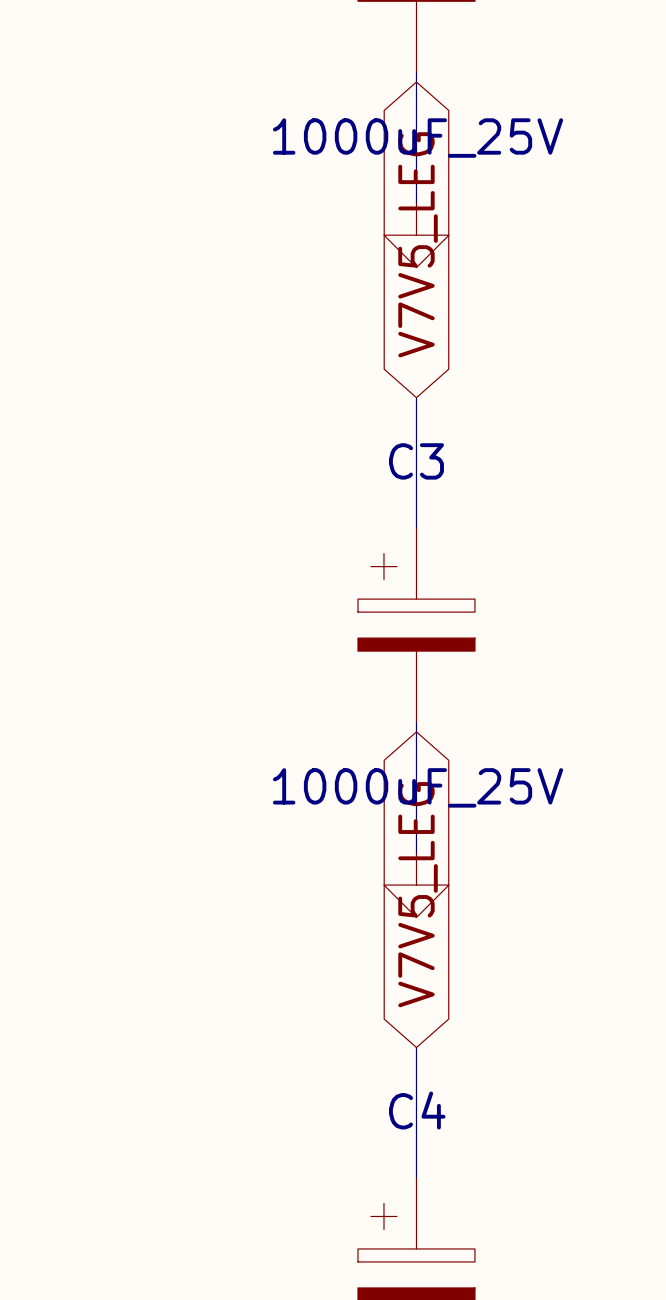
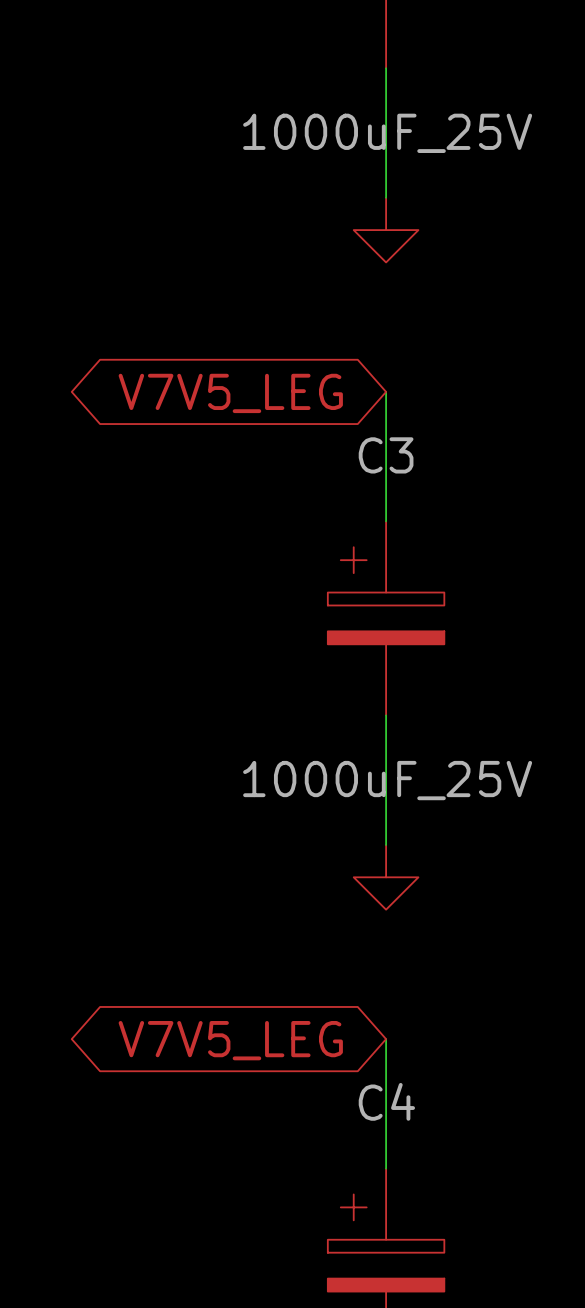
global label rotation: 0° (418, 244) -> 90° counterclockwise (230, 393)
global label rotation: 0° (418, 894) -> 90° counterclockwise (230, 1040)

